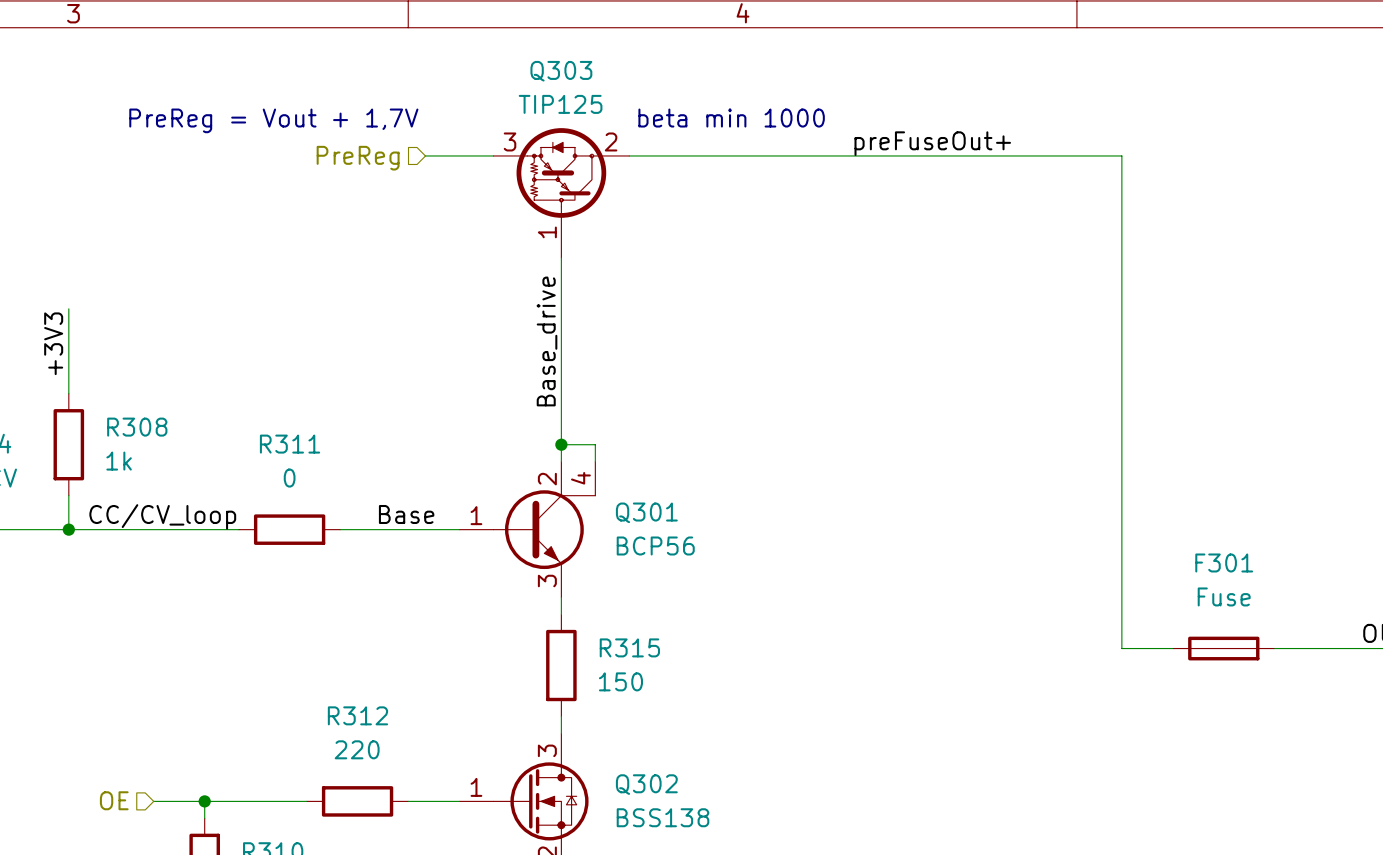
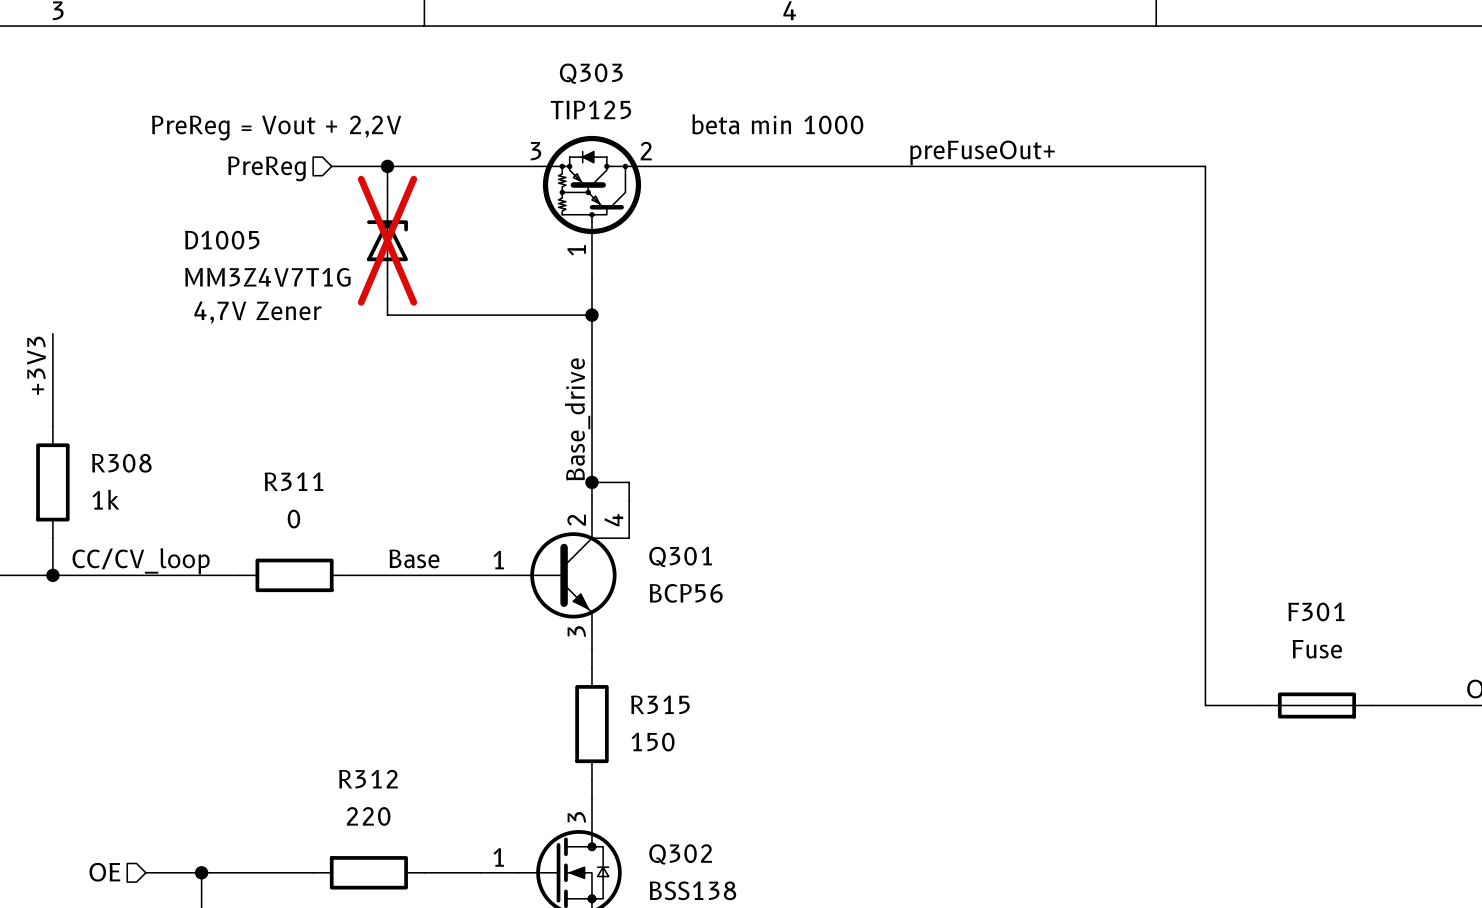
text: PreReg = Vout + 1,7V (273, 120) -> PreReg = Vout + 2,2V (276, 128)
wire: none -> (331, 166) (443, 166)
wire: none -> (387, 166) (387, 184)
junction: none -> (387, 166)
hierarchical label position: PreReg (358, 158) -> PreReg (266, 168)
D1005: none -> MM3Z4V7T1G (387, 240)
wire: none -> (387, 296) (387, 315) (591, 315)
text: none -> 4,7V Zener (257, 312)
junction: none -> (591, 315)
label position: Base_drive (547, 341) -> Base_drive (577, 419)

